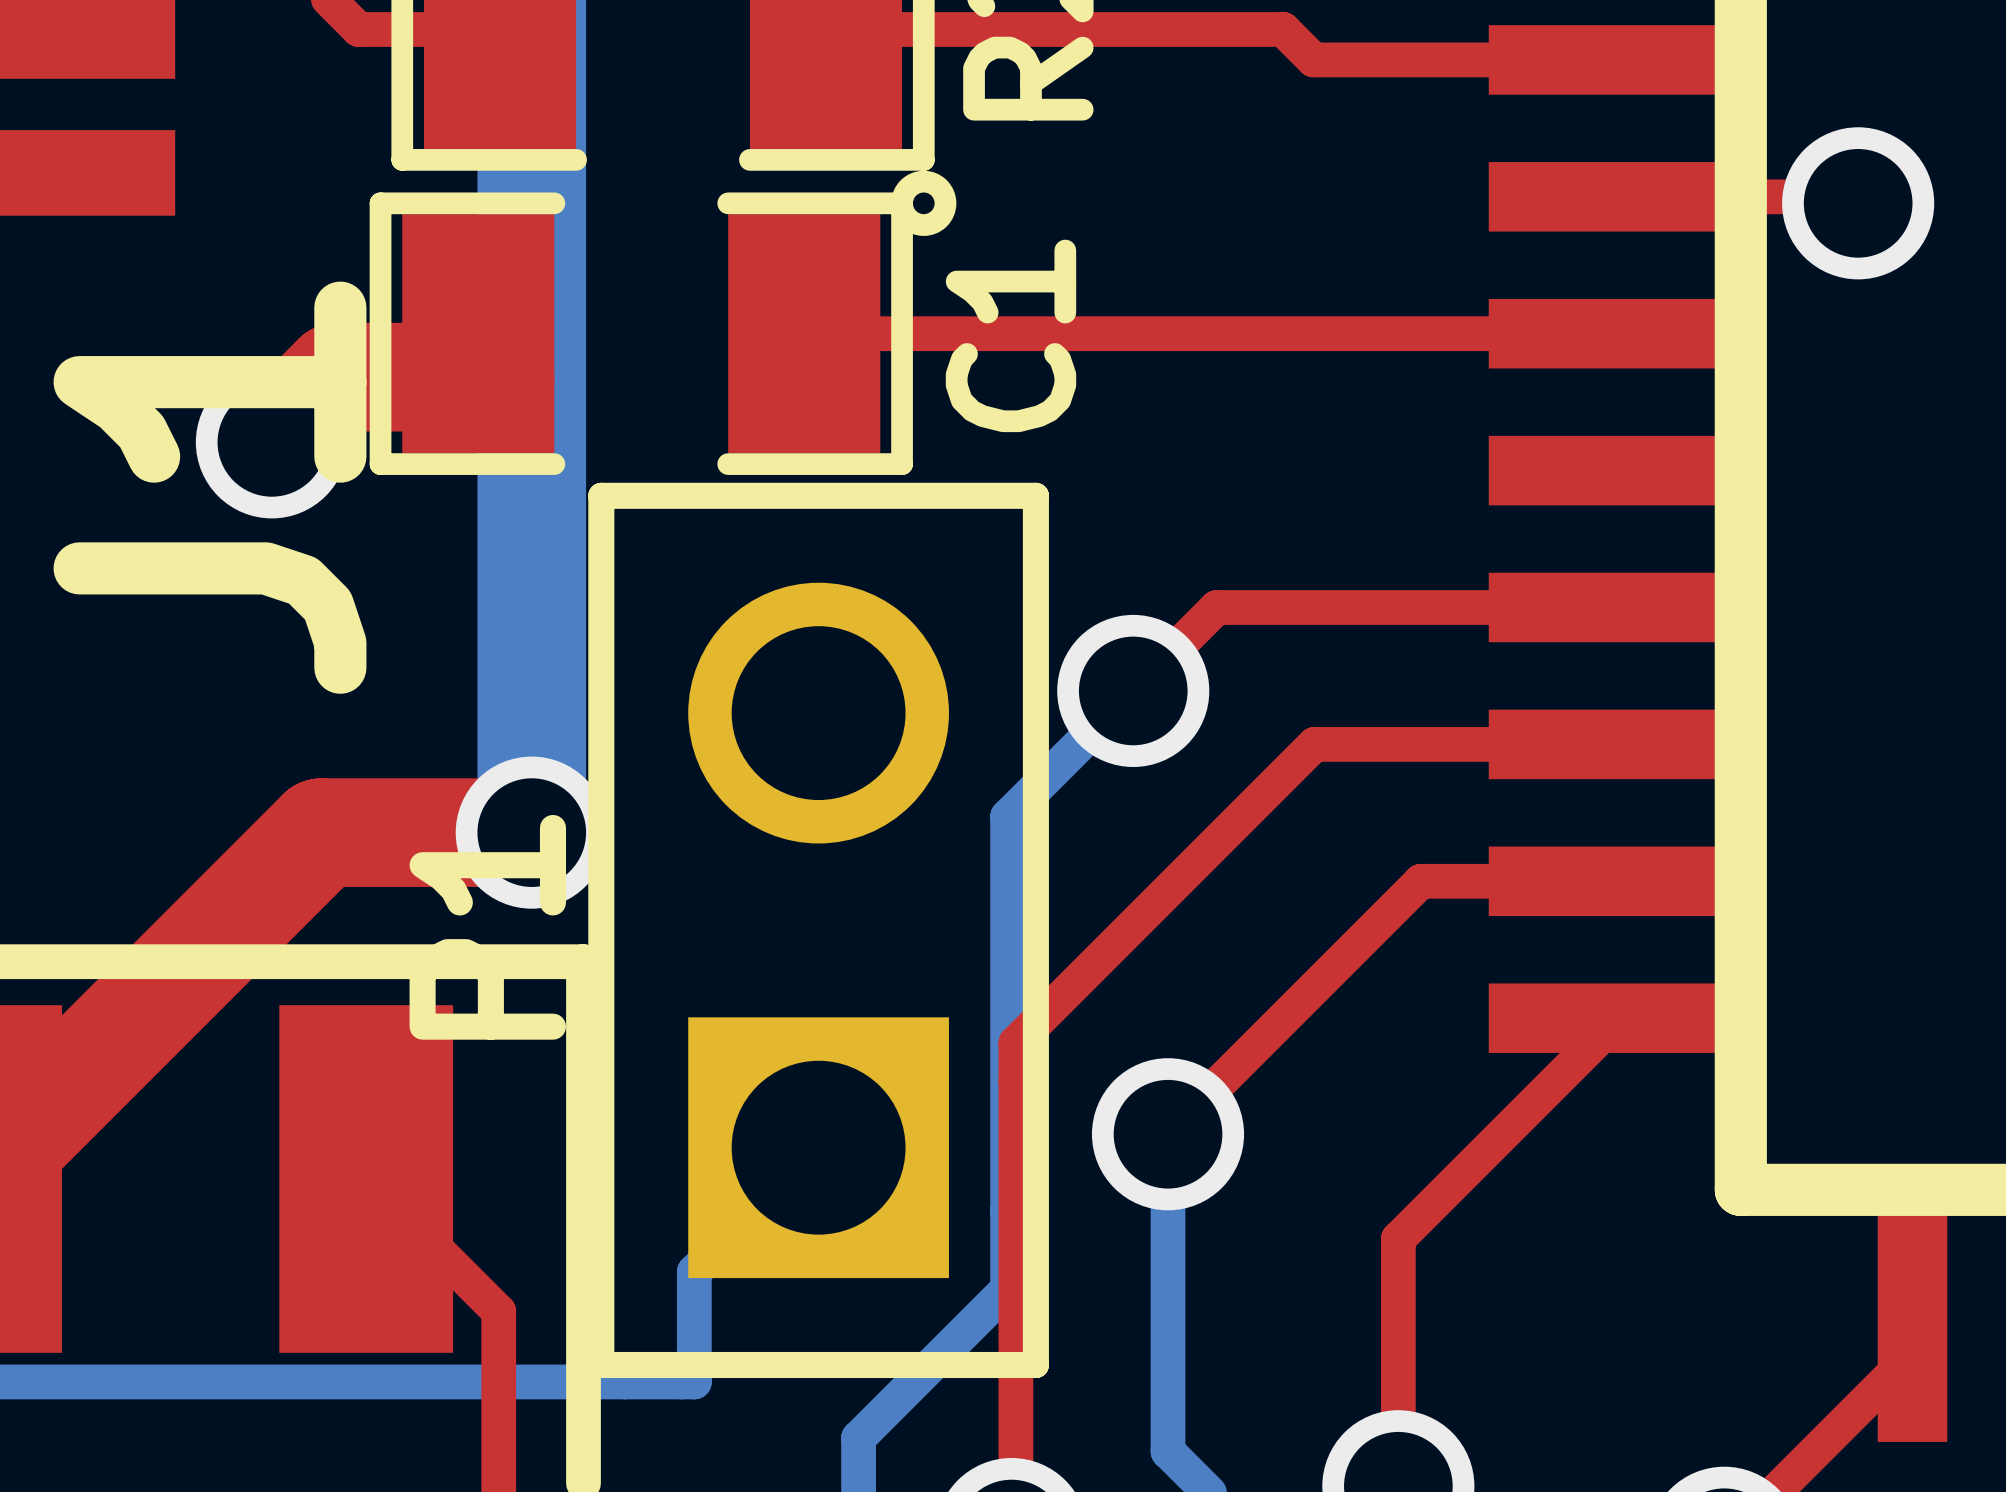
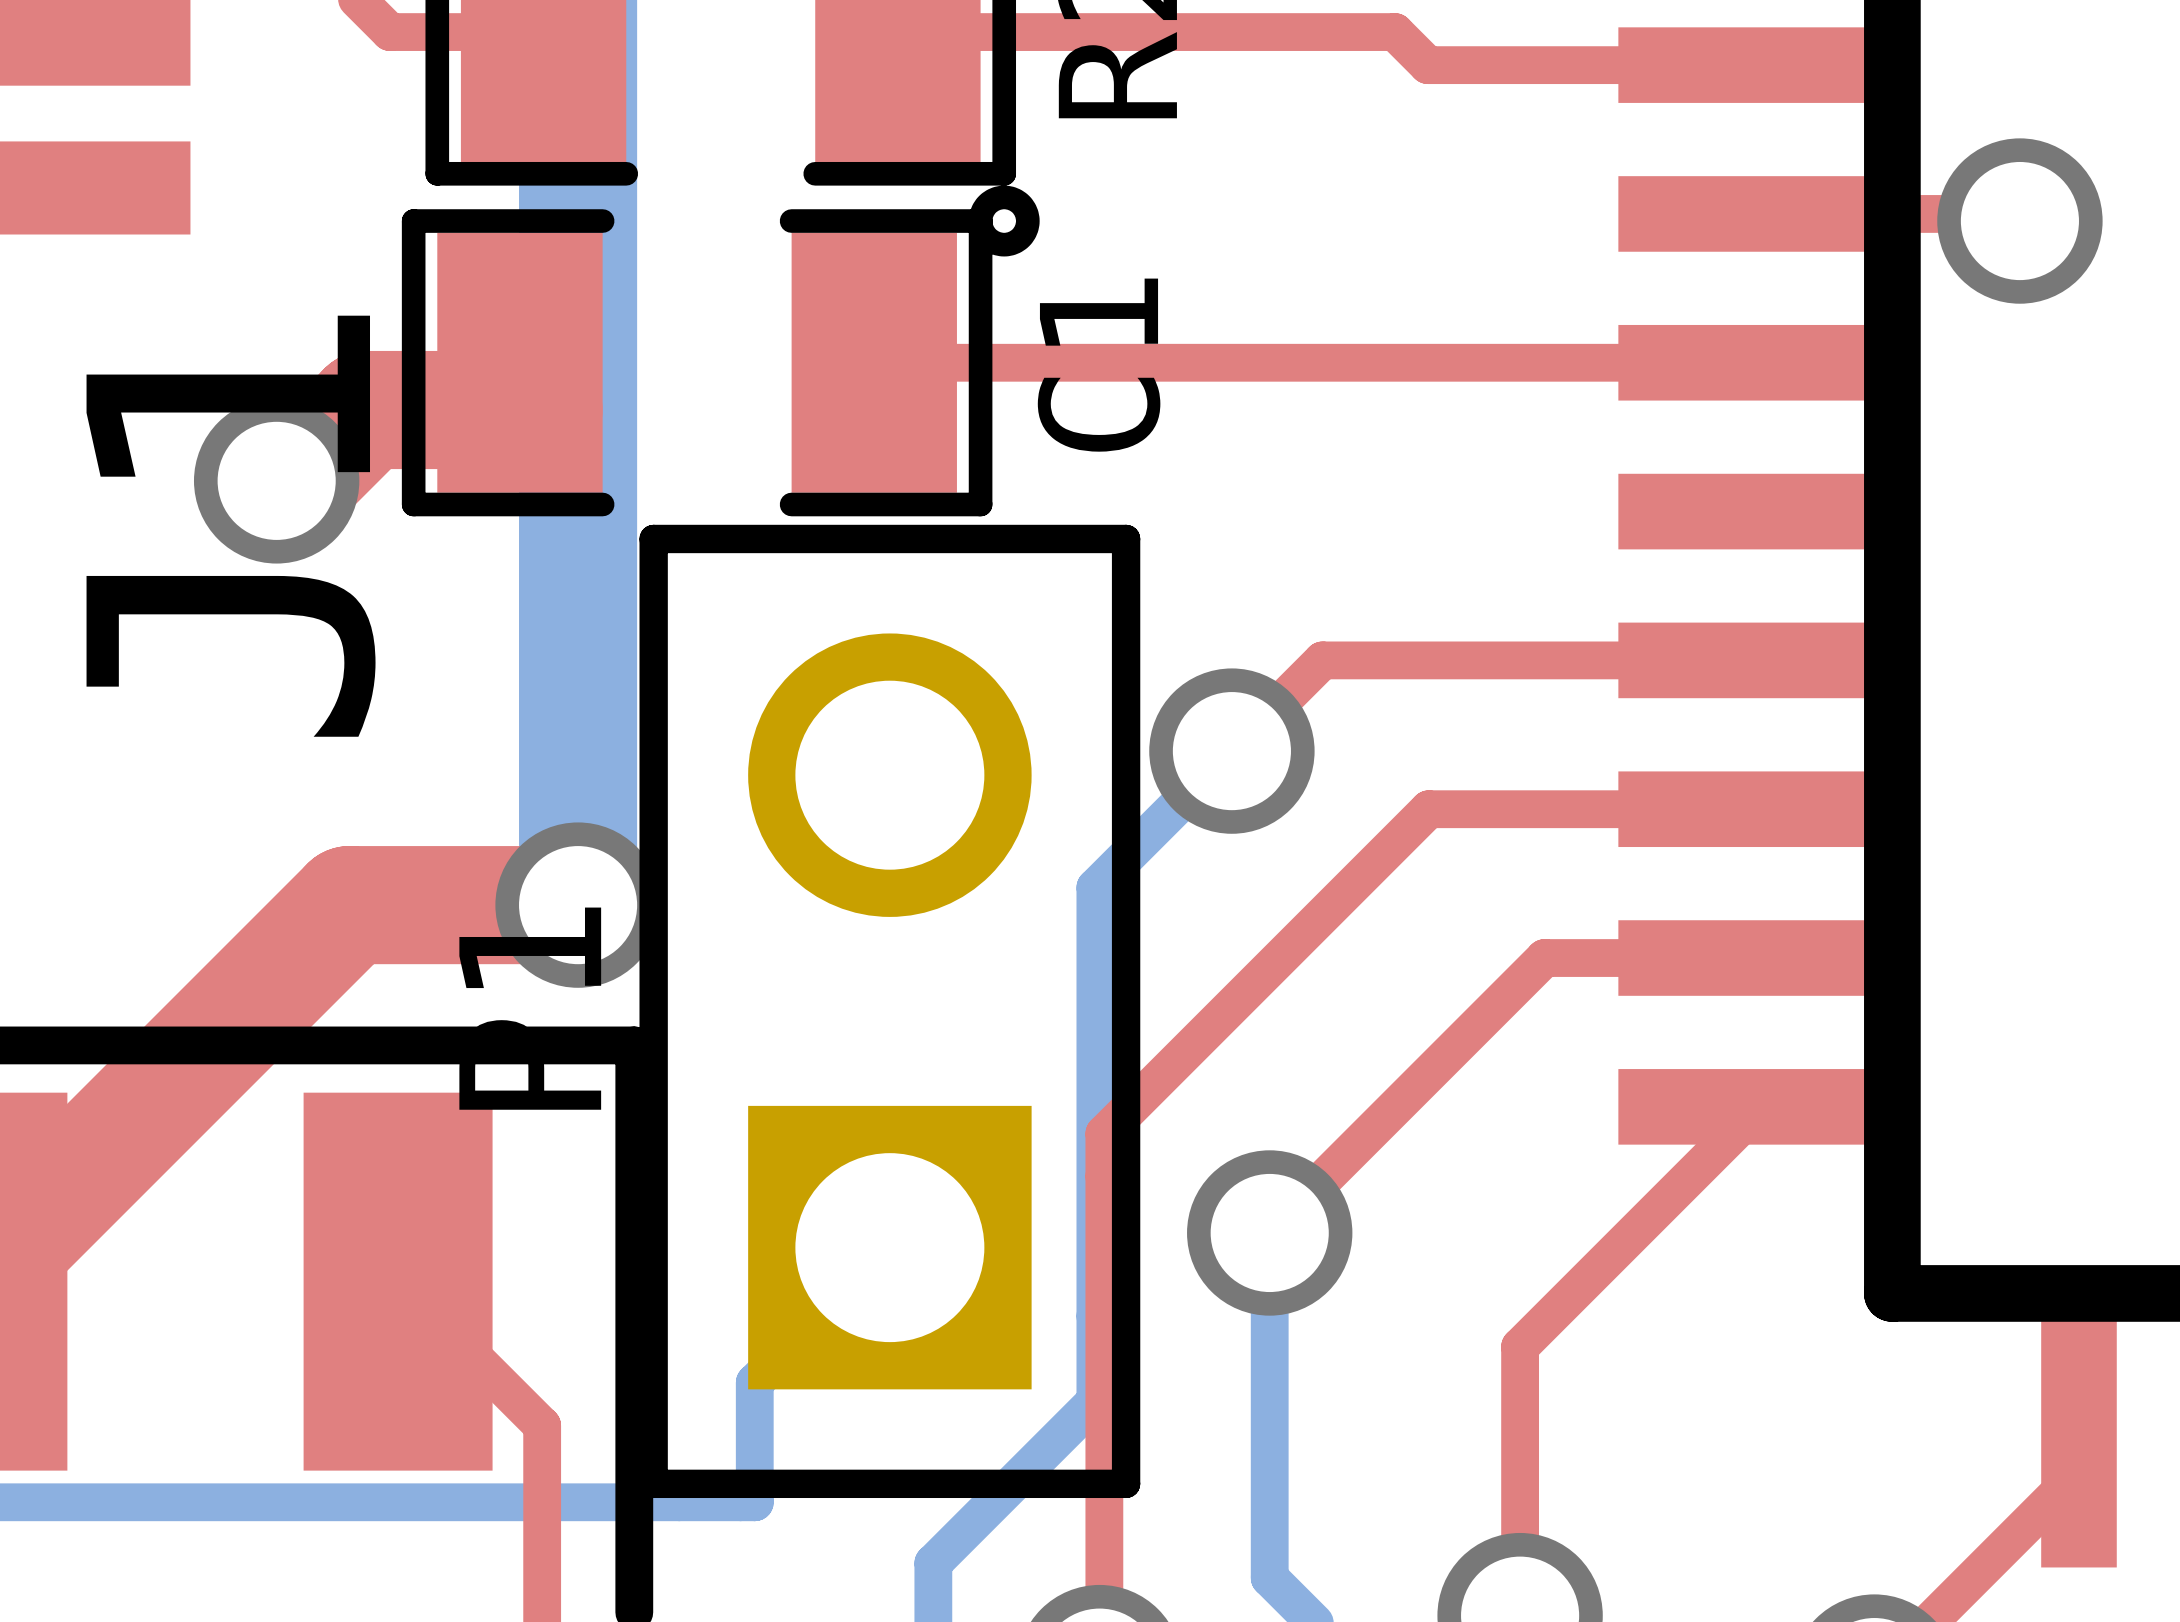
via position: (271, 442) -> (276, 480)

